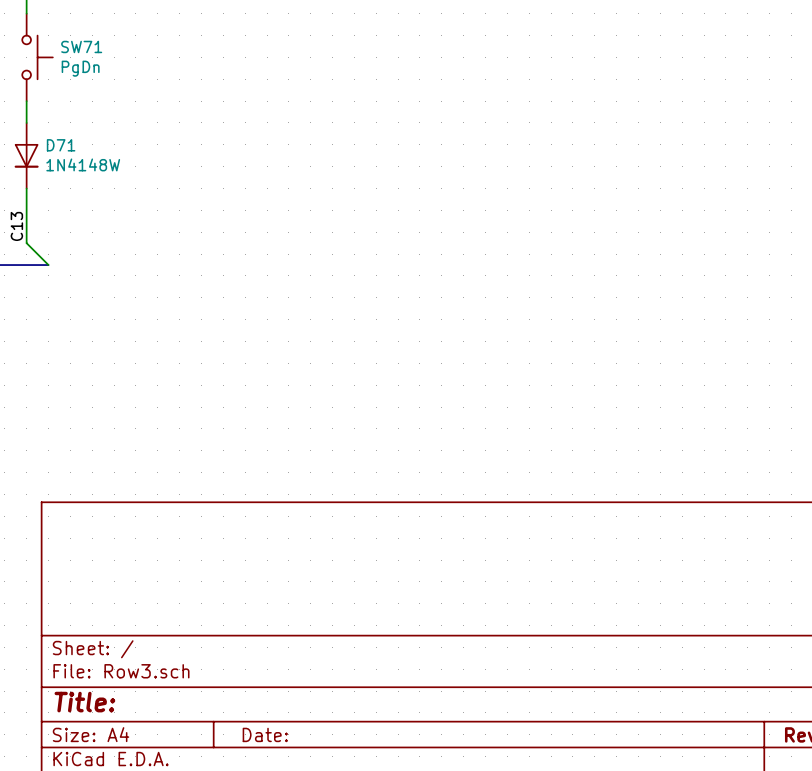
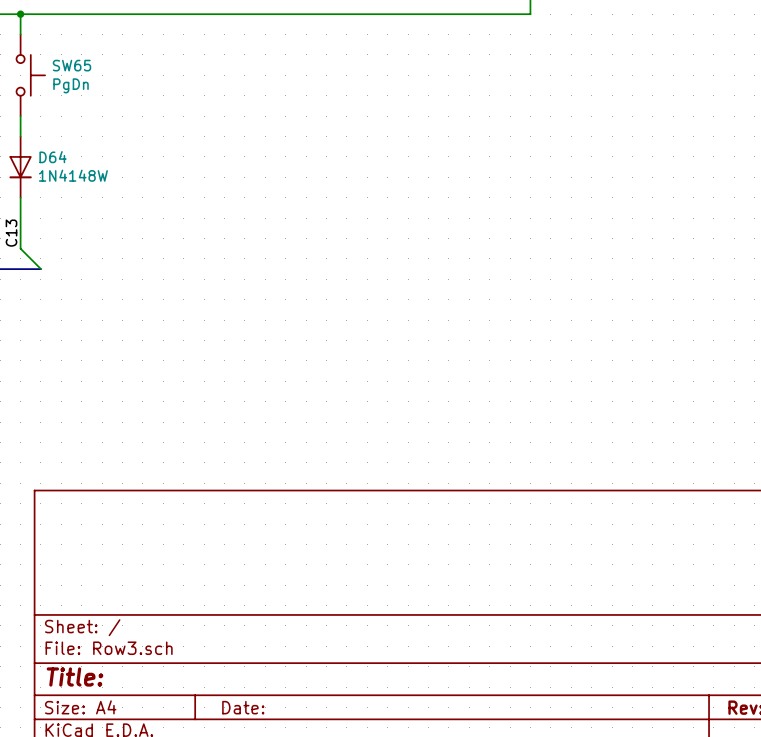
SW71 name: SW71 (81, 46) -> SW65 (71, 65)
D71 name: D71 (61, 145) -> D64 (53, 157)

